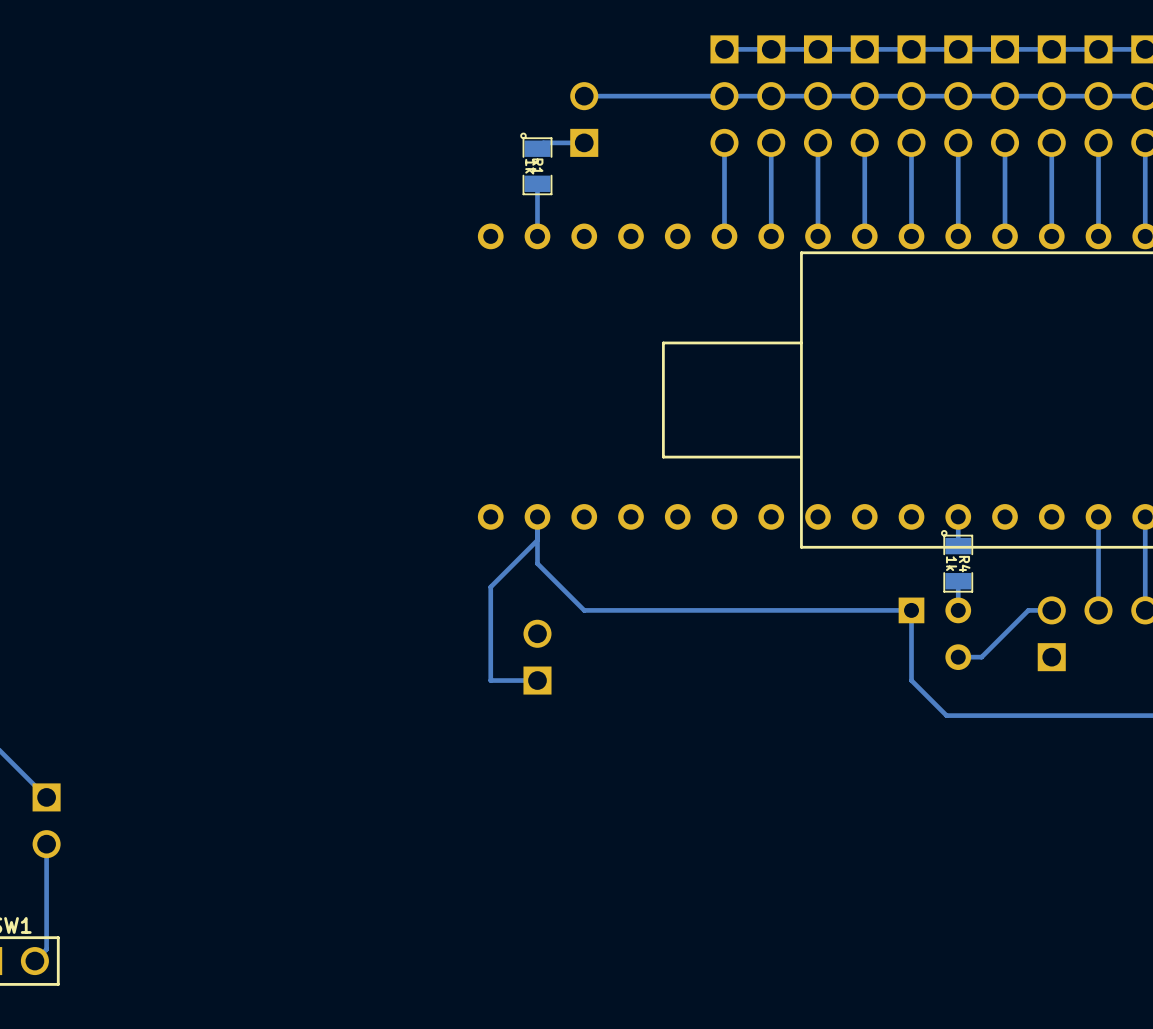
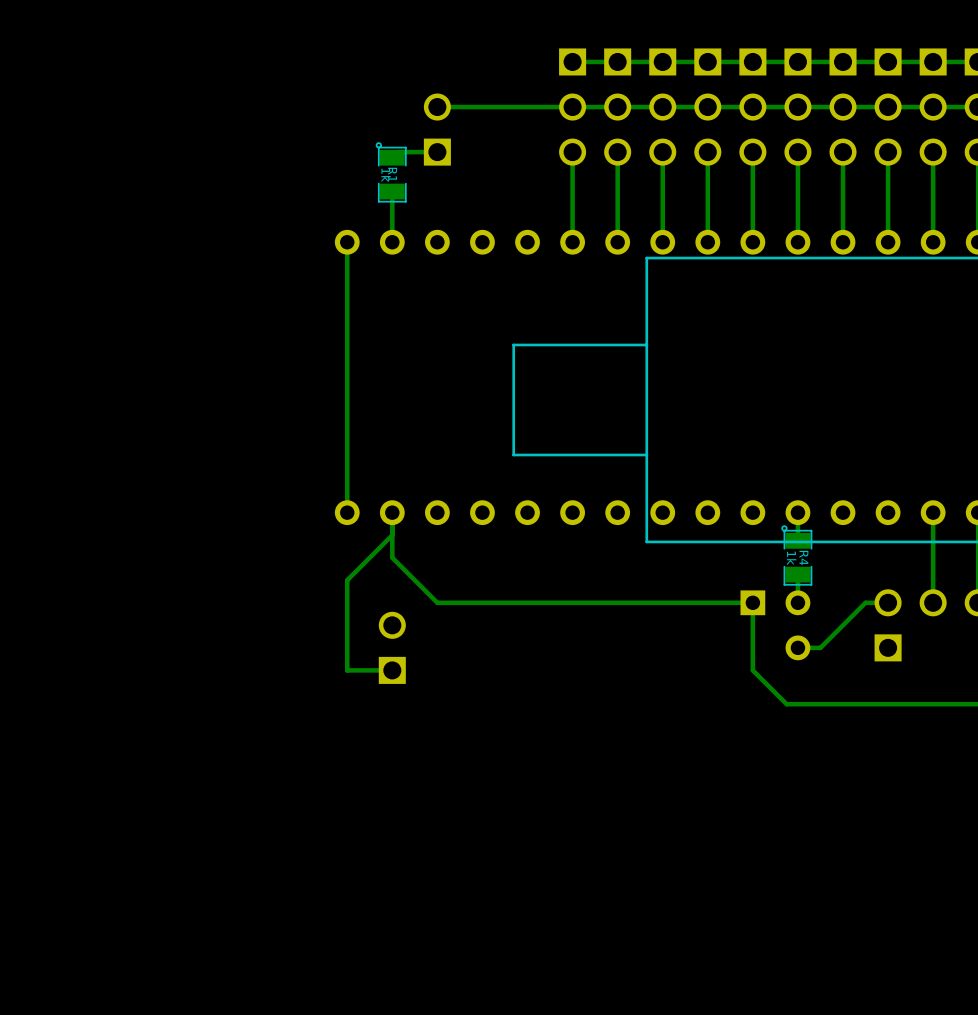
track: none -> (347, 242) (347, 512)

